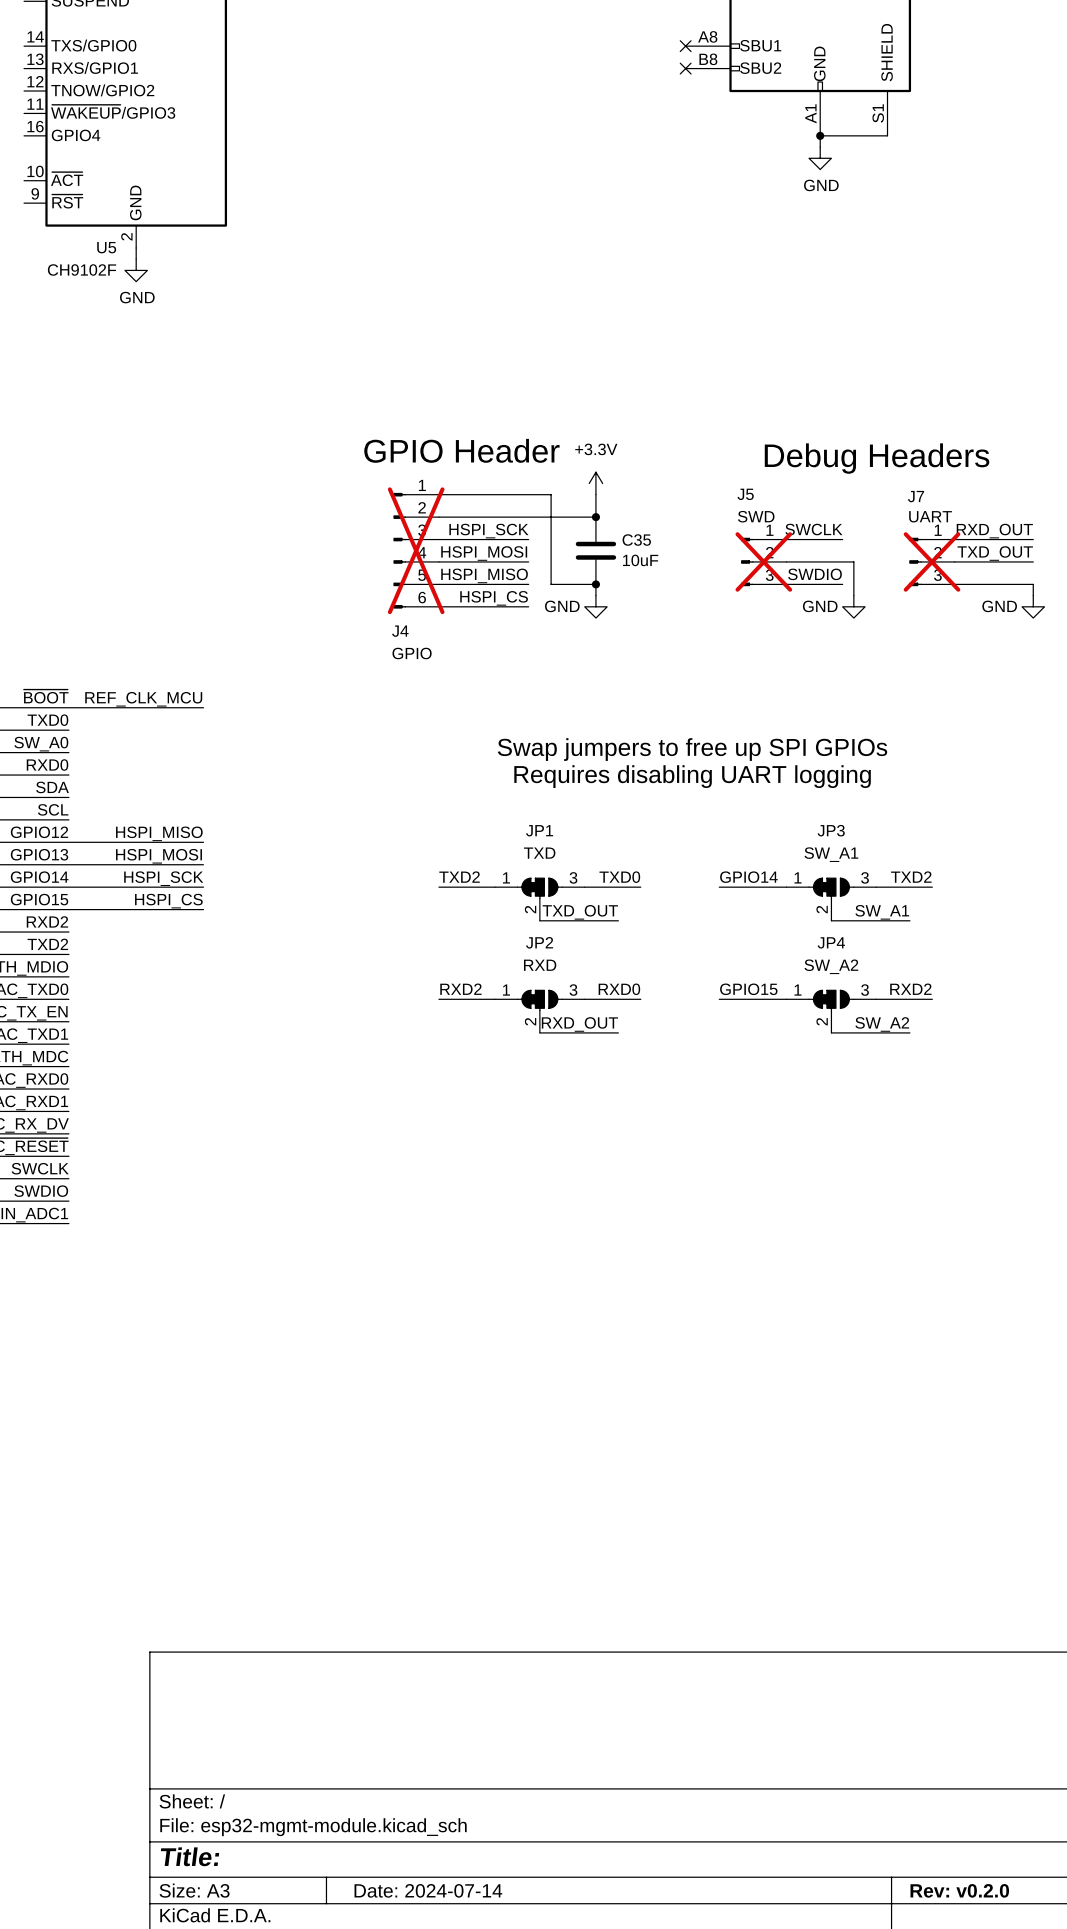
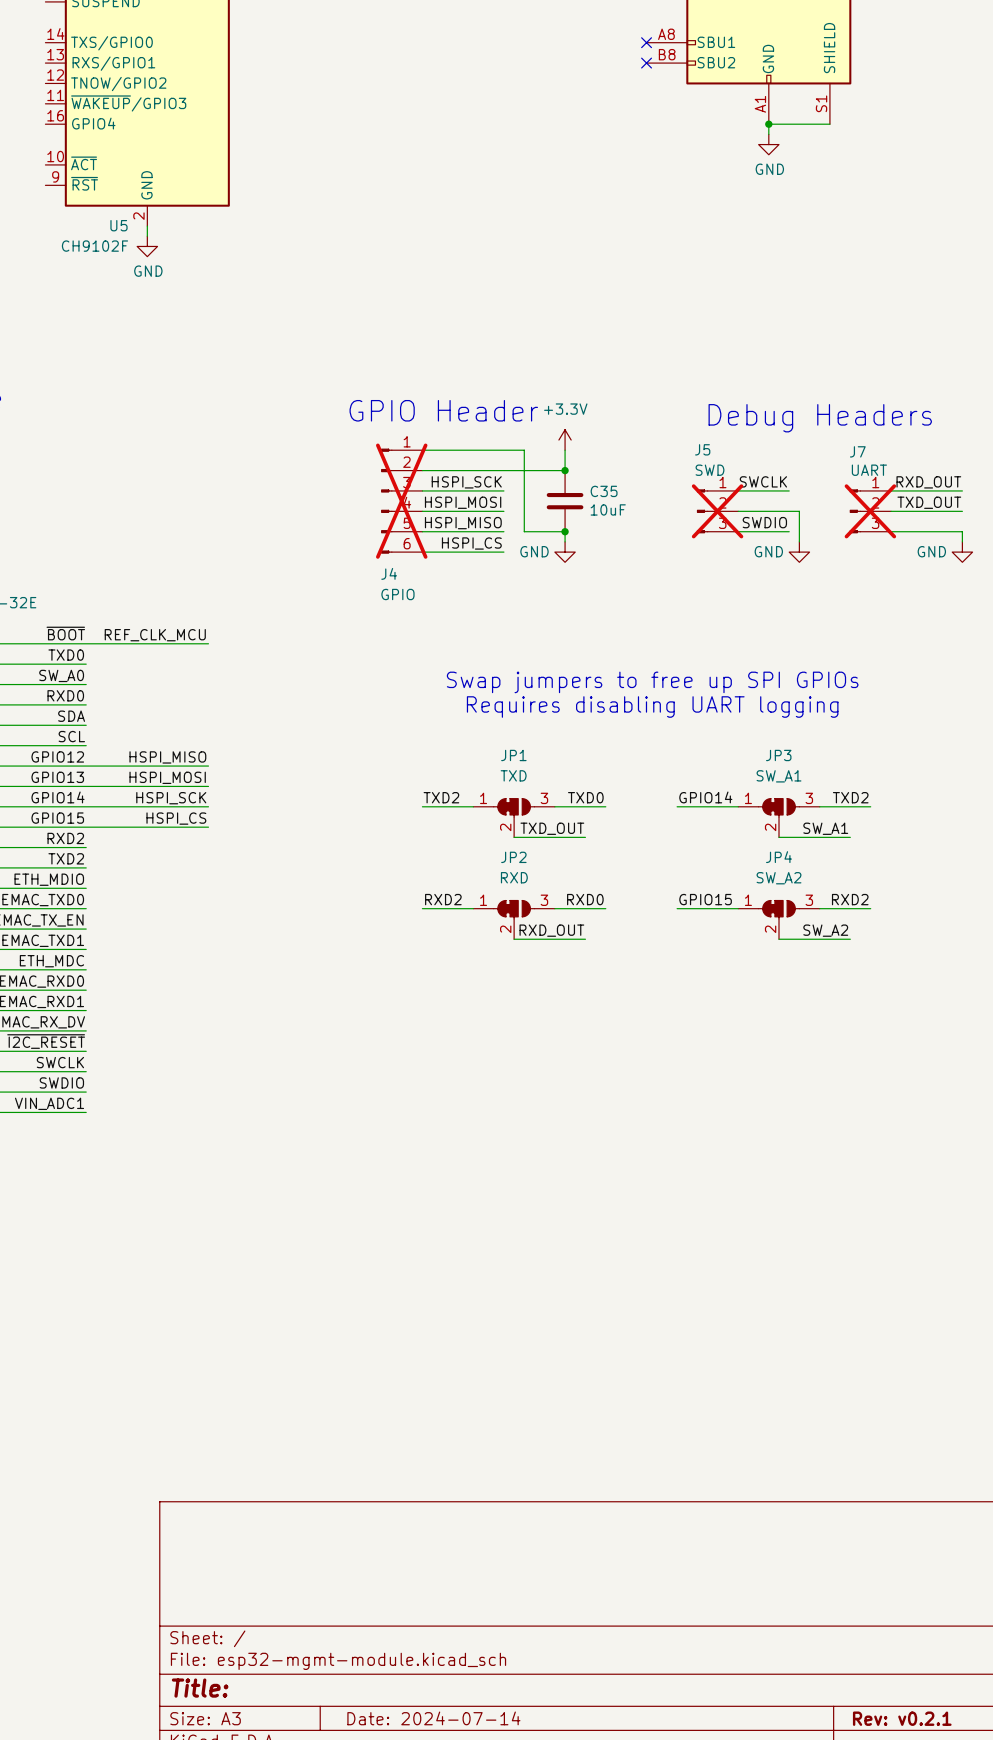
title block: Rev: v0.2.0 (959, 1890) -> Rev: v0.2.1 (902, 1718)

